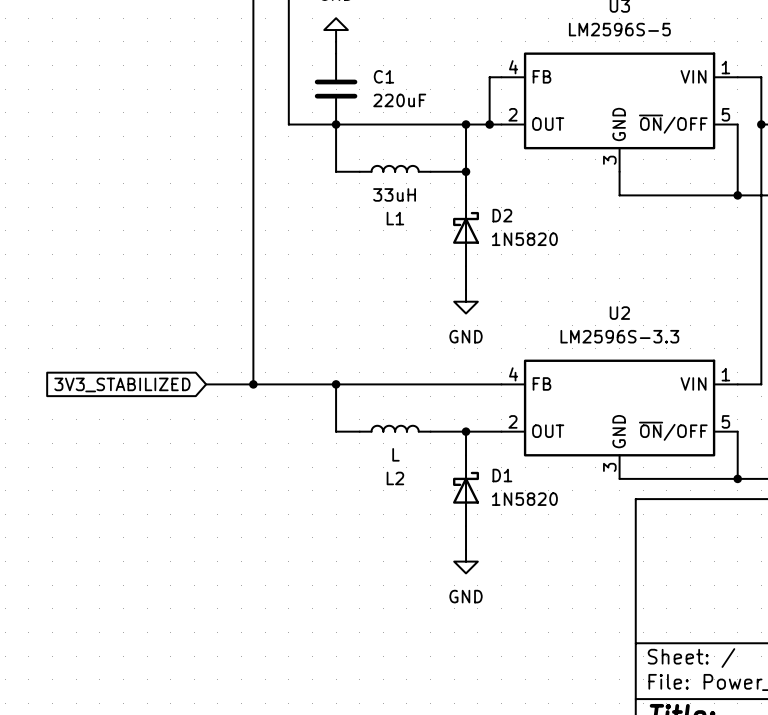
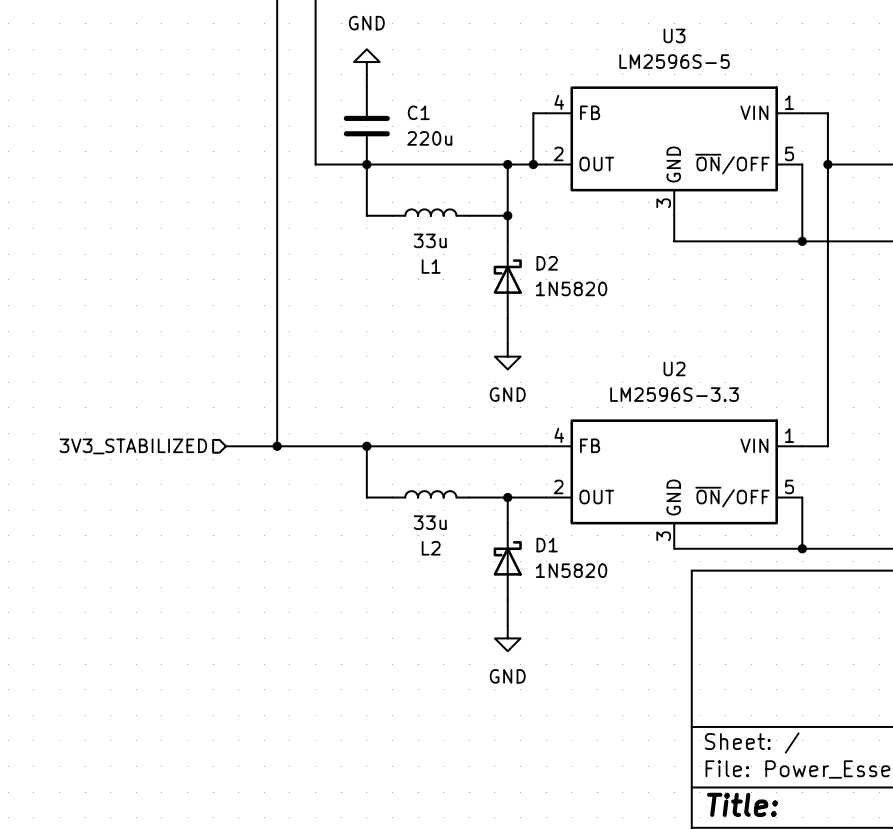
C1 value: 220uF (399, 100) -> 220u (429, 138)
L1 value: 33uH (394, 194) -> 33u (430, 240)
hierarchical label: none -> 3V3_STABILIZED (133, 446)
global label: 3V3_STABILIZED (122, 384) -> none
L2 value: L (395, 454) -> 33u (430, 522)

